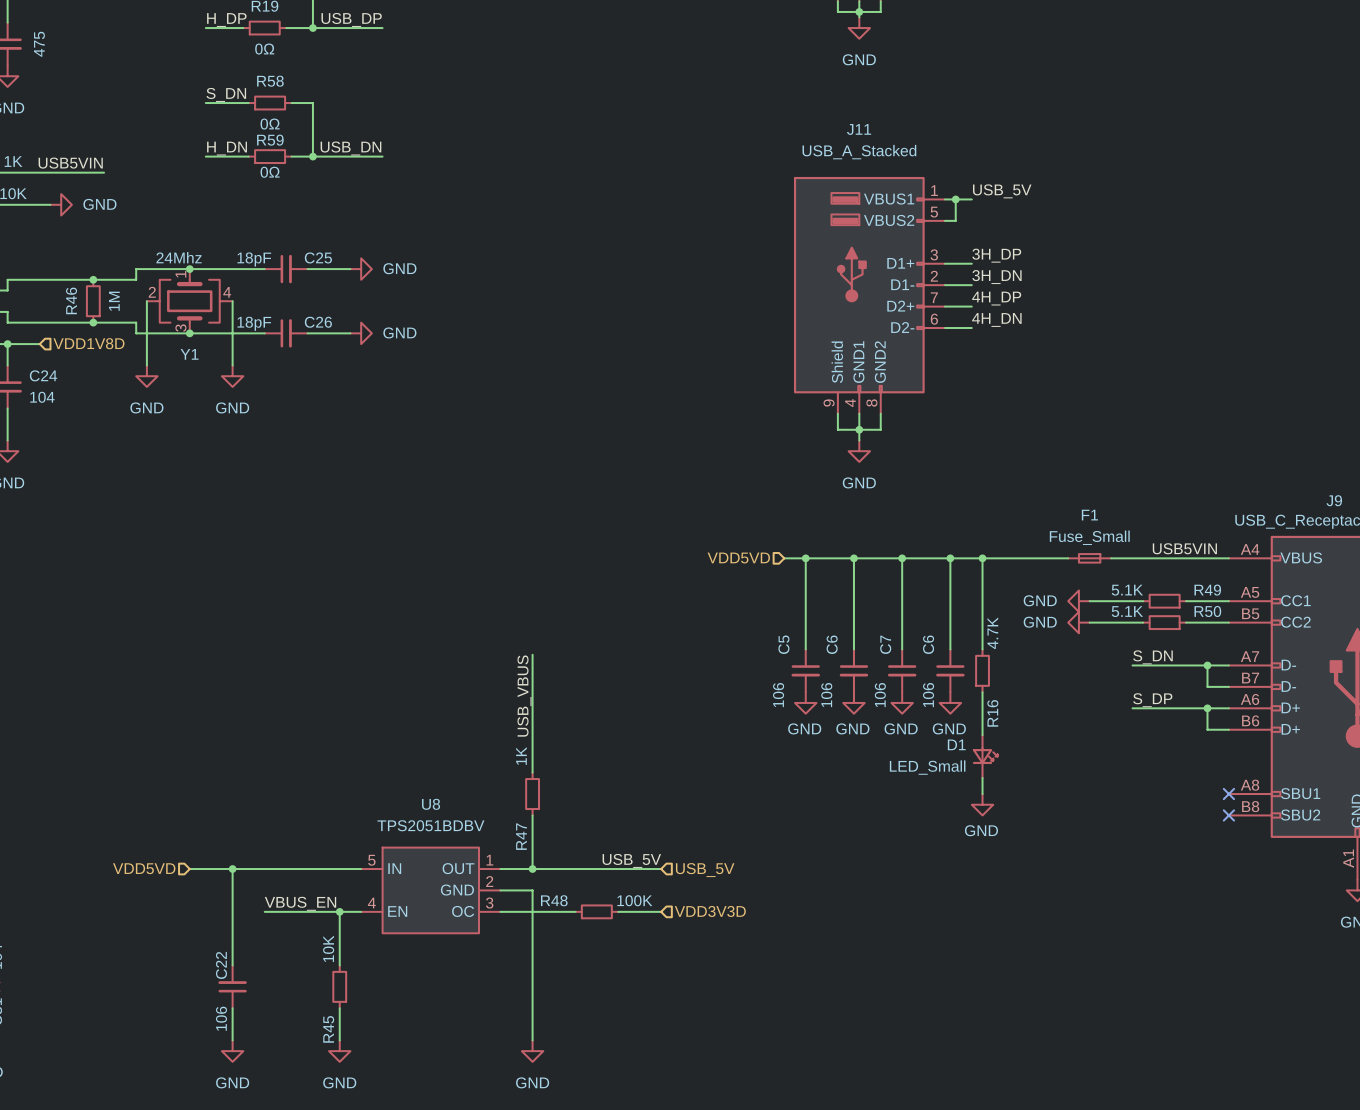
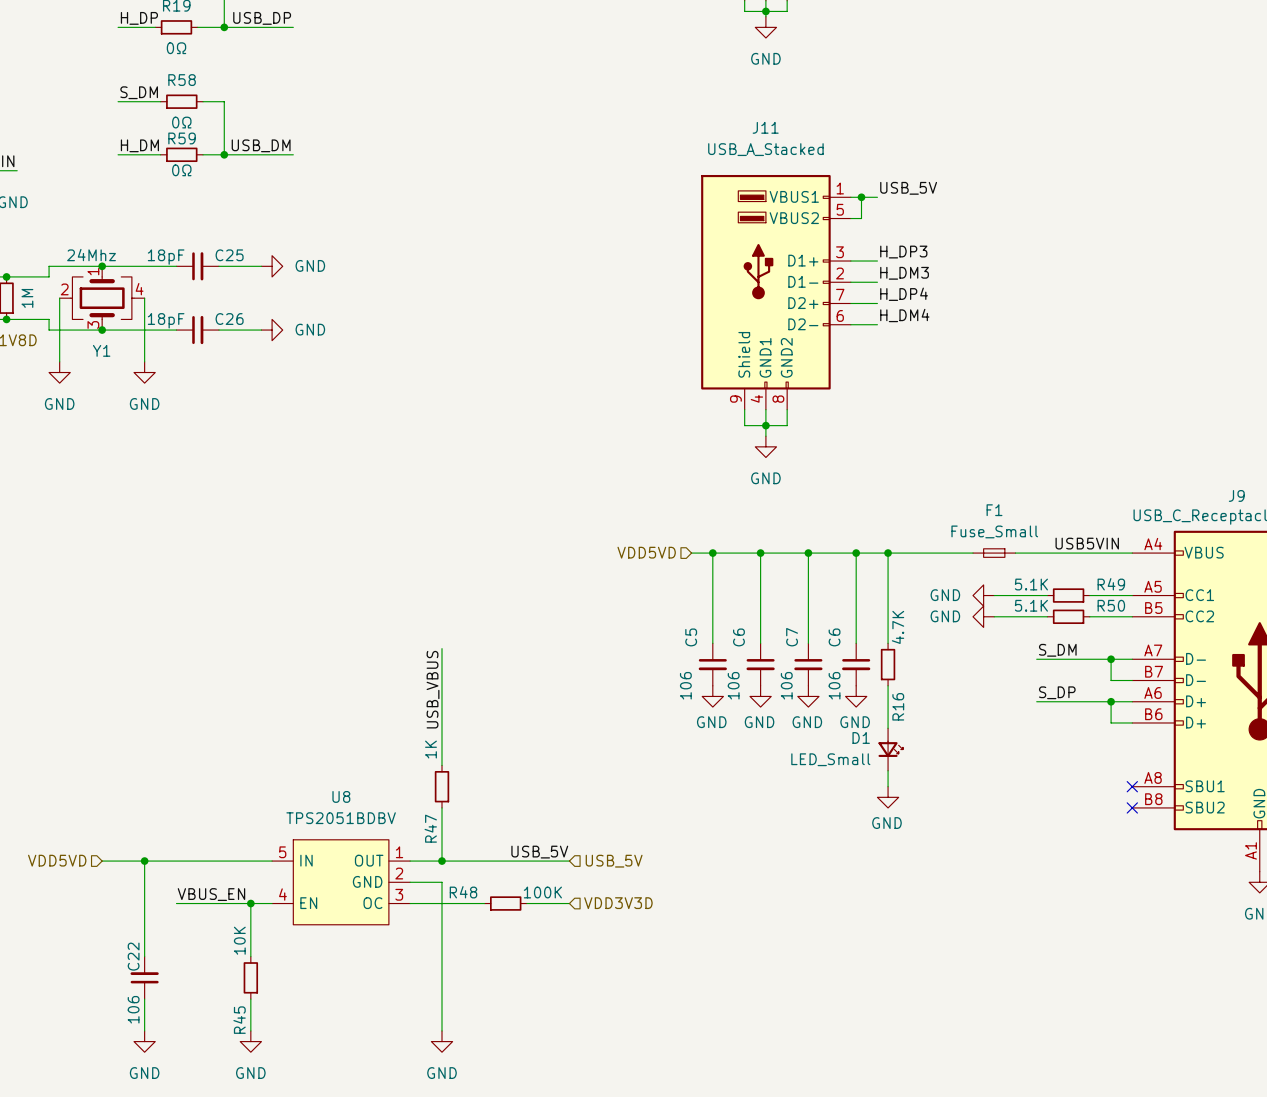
label: S_DN (226, 94) -> S_DM (139, 92)
label: H_DN (227, 148) -> H_DM (139, 145)
label: USB_DN (350, 148) -> USB_DM (261, 145)
label: 3H_DP (996, 255) -> H_DP3 (903, 252)
label: 3H_DN (997, 277) -> H_DM3 (904, 273)
label: 4H_DP (996, 298) -> H_DP4 (904, 294)
label: 4H_DN (996, 319) -> H_DM4 (904, 315)
label: S_DN (1152, 657) -> S_DM (1057, 650)

